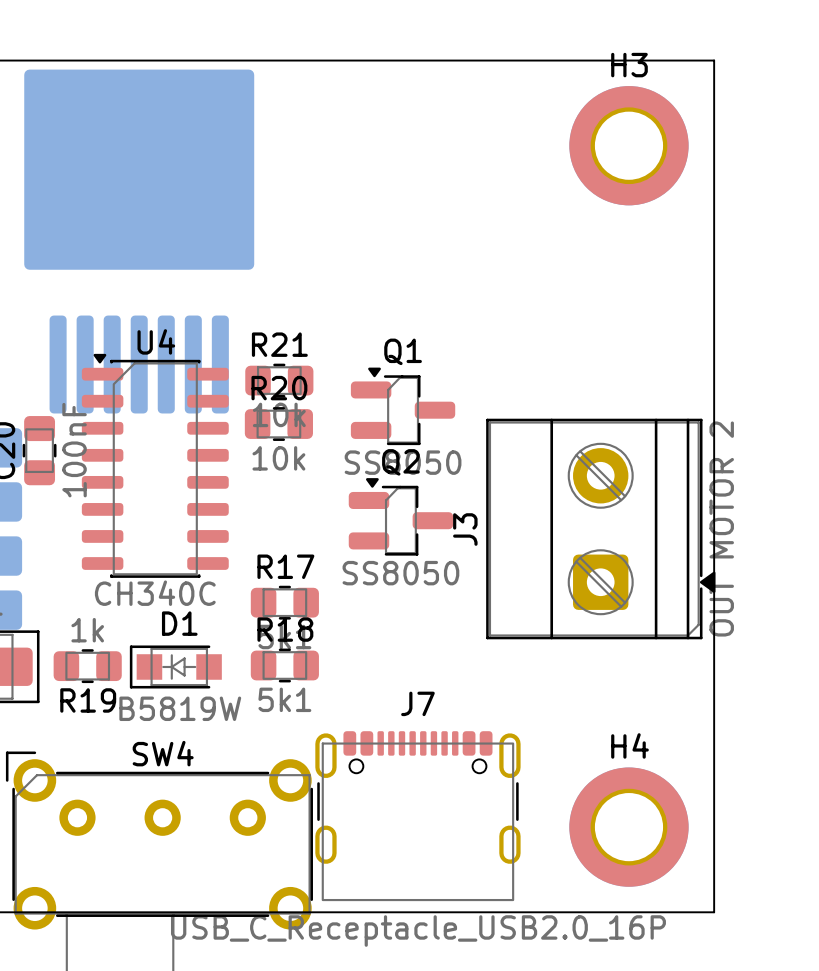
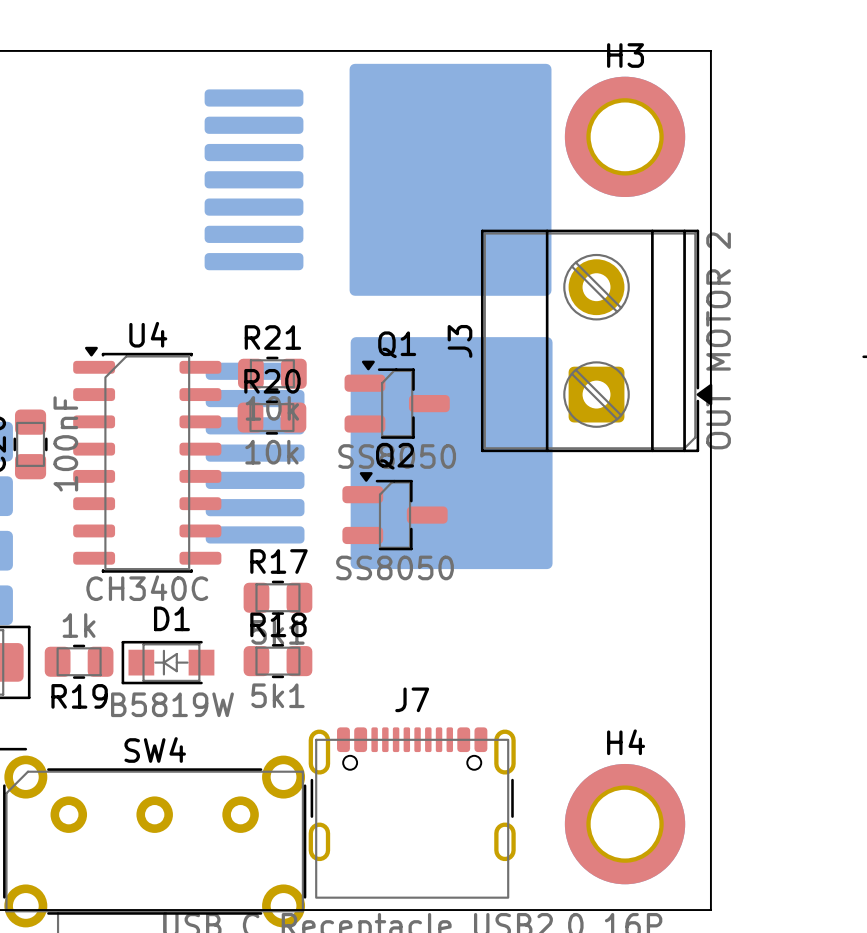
part: none -> (378, 179)
part: (139, 241) -> none
part: none -> (379, 453)
J3 position: (600, 529) -> (596, 340)

